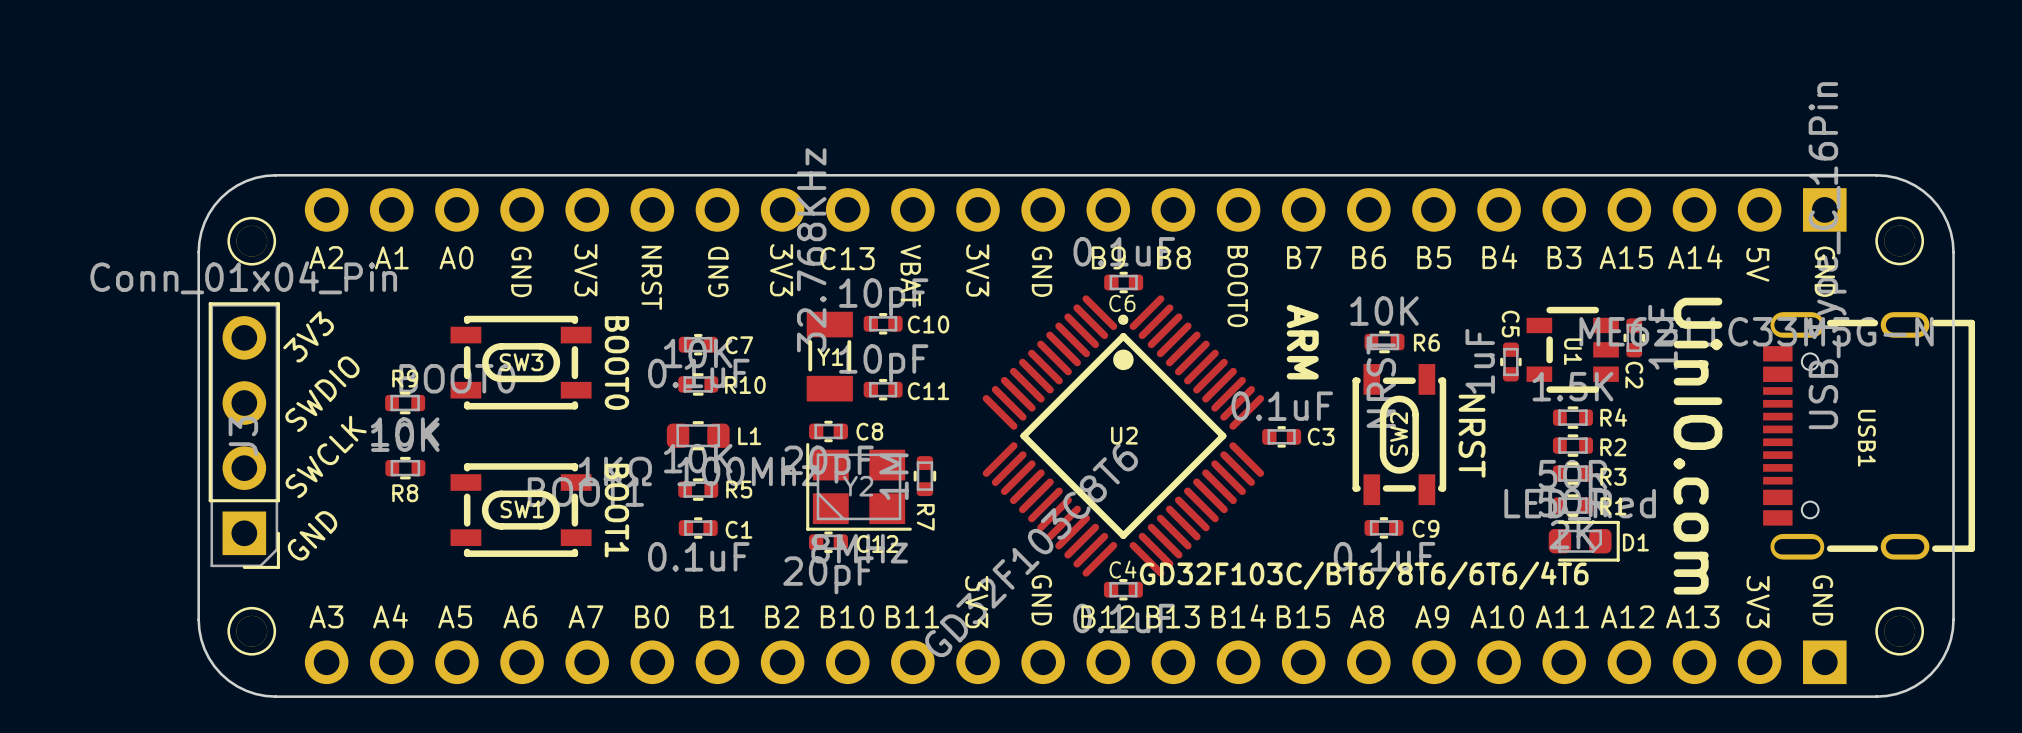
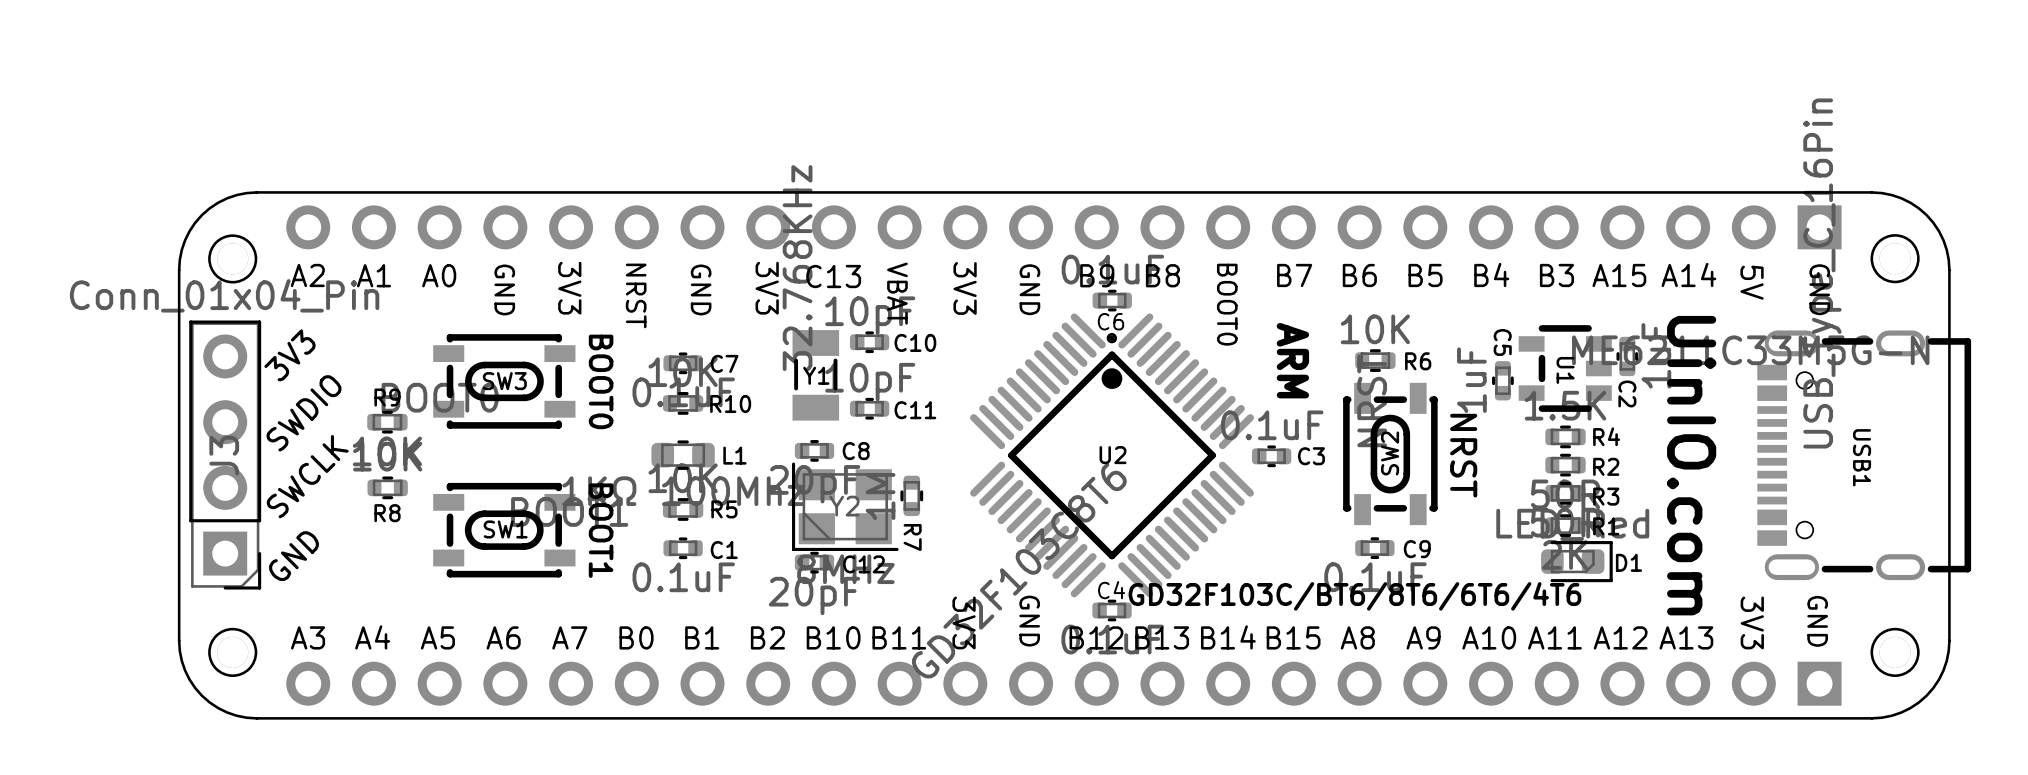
text rotation: 0° (718, 271) -> 180° (701, 289)

